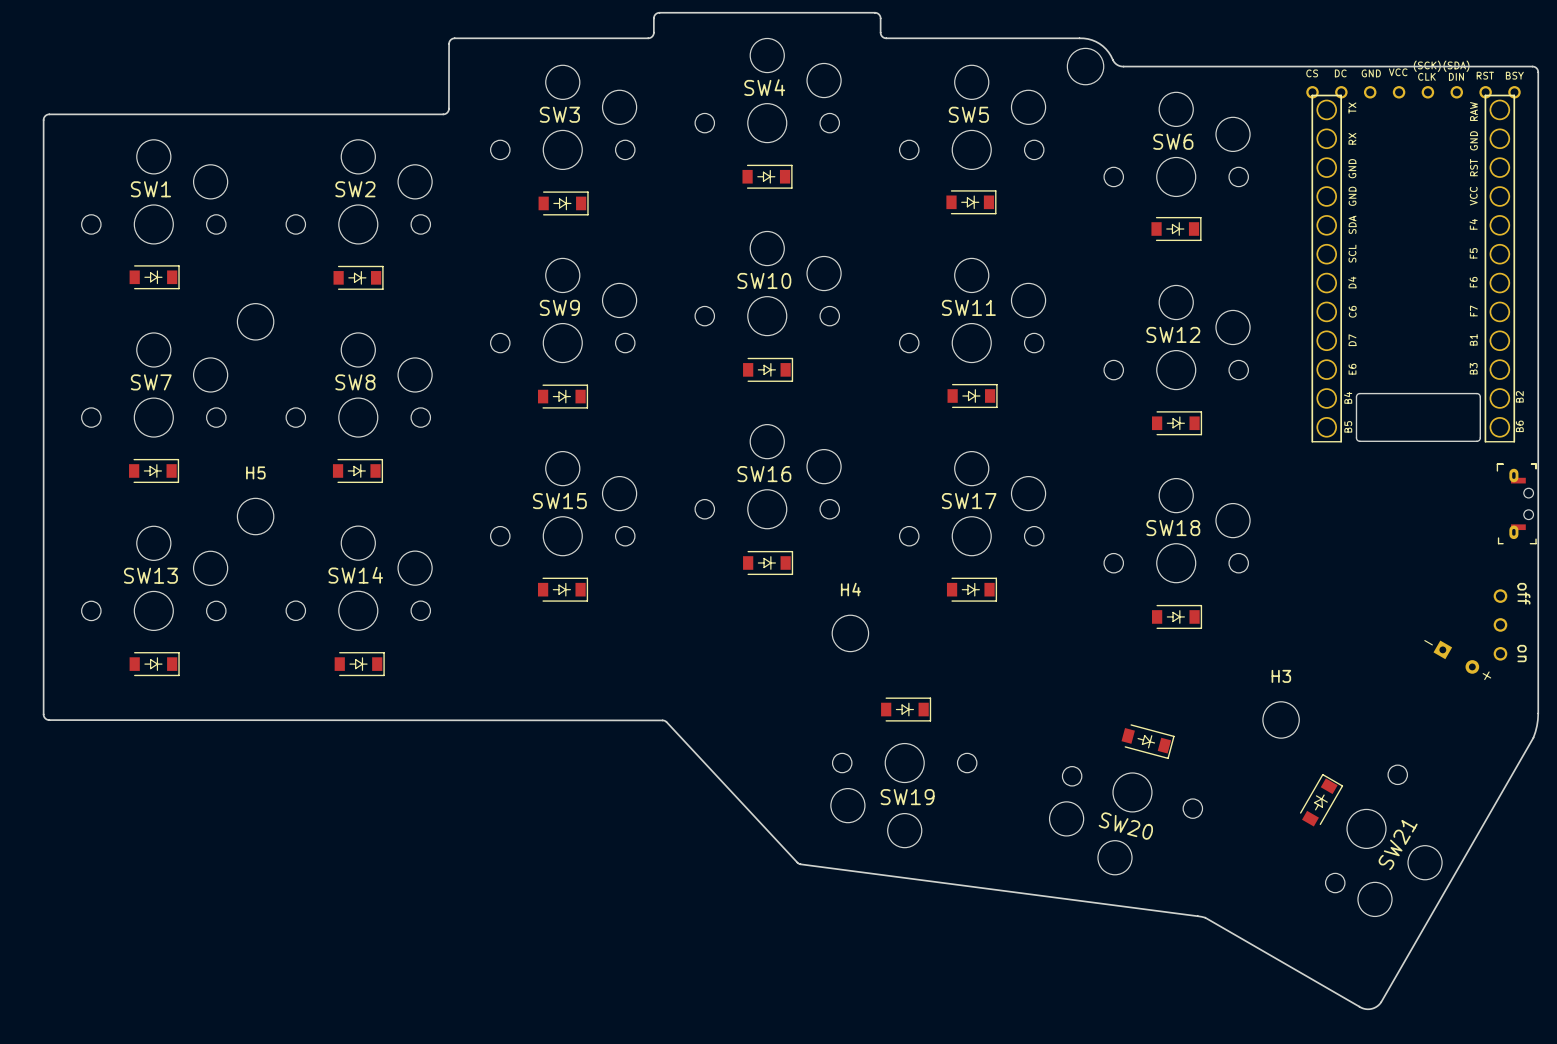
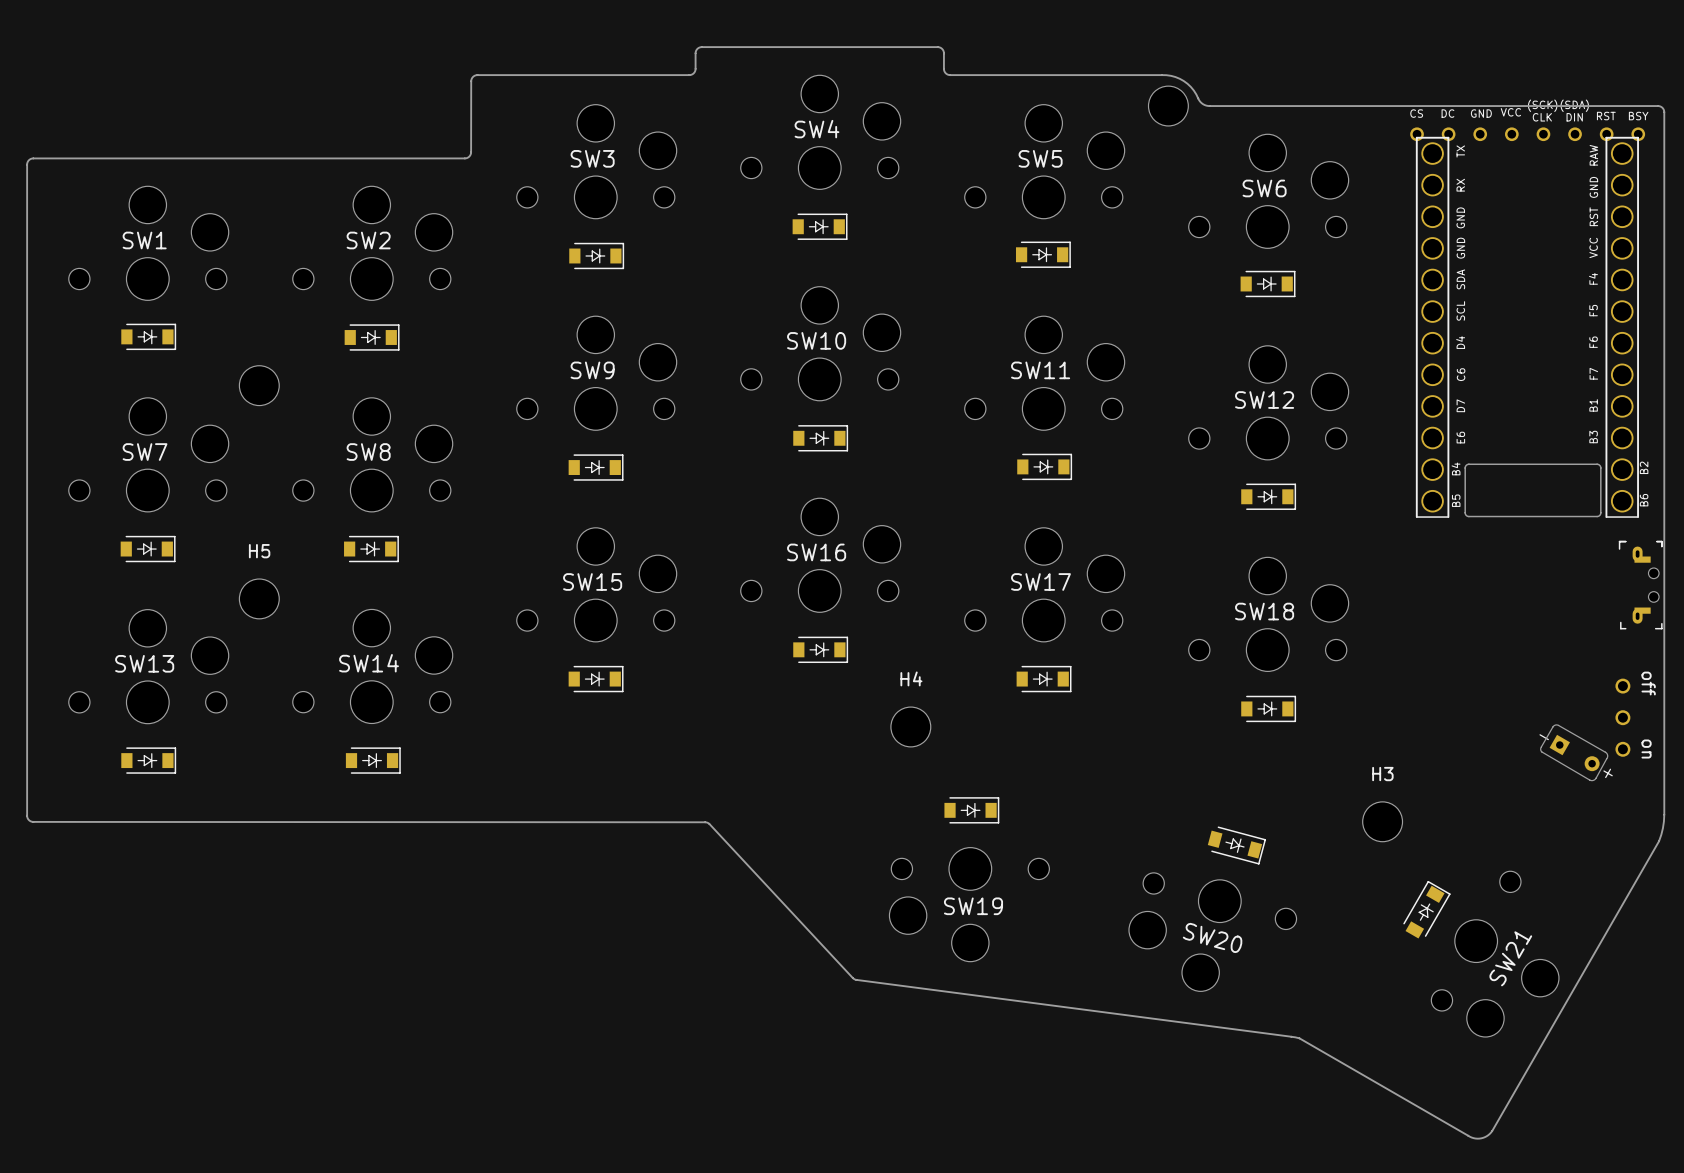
board edge: none -> (1558, 725) (1607, 753) (1607, 757) (1594, 779) (1589, 780) (1541, 751) (1540, 747) (1552, 726) (1558, 725)

